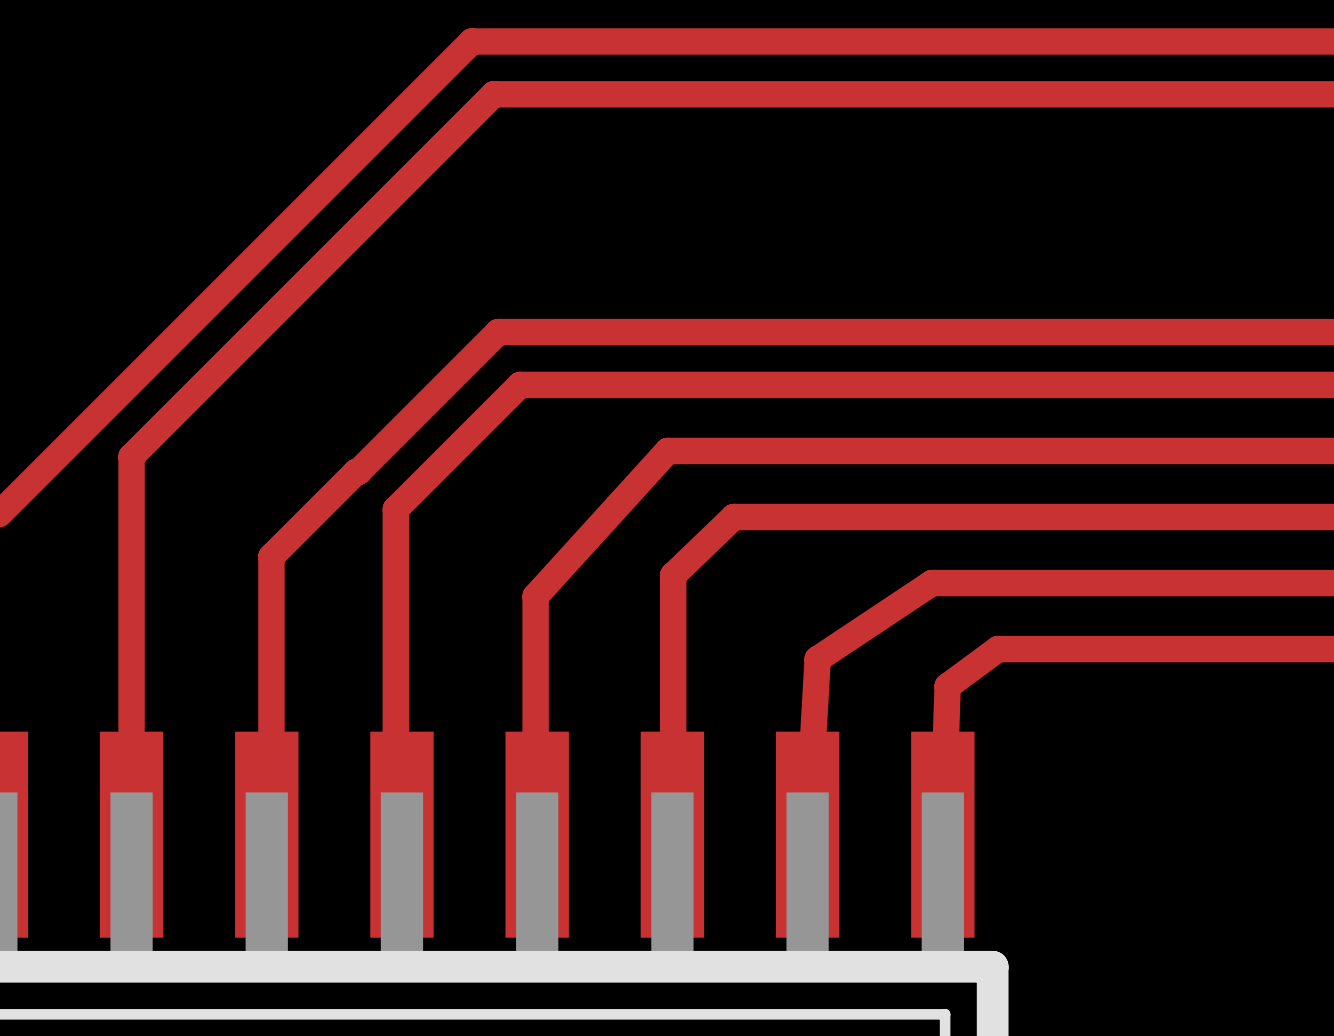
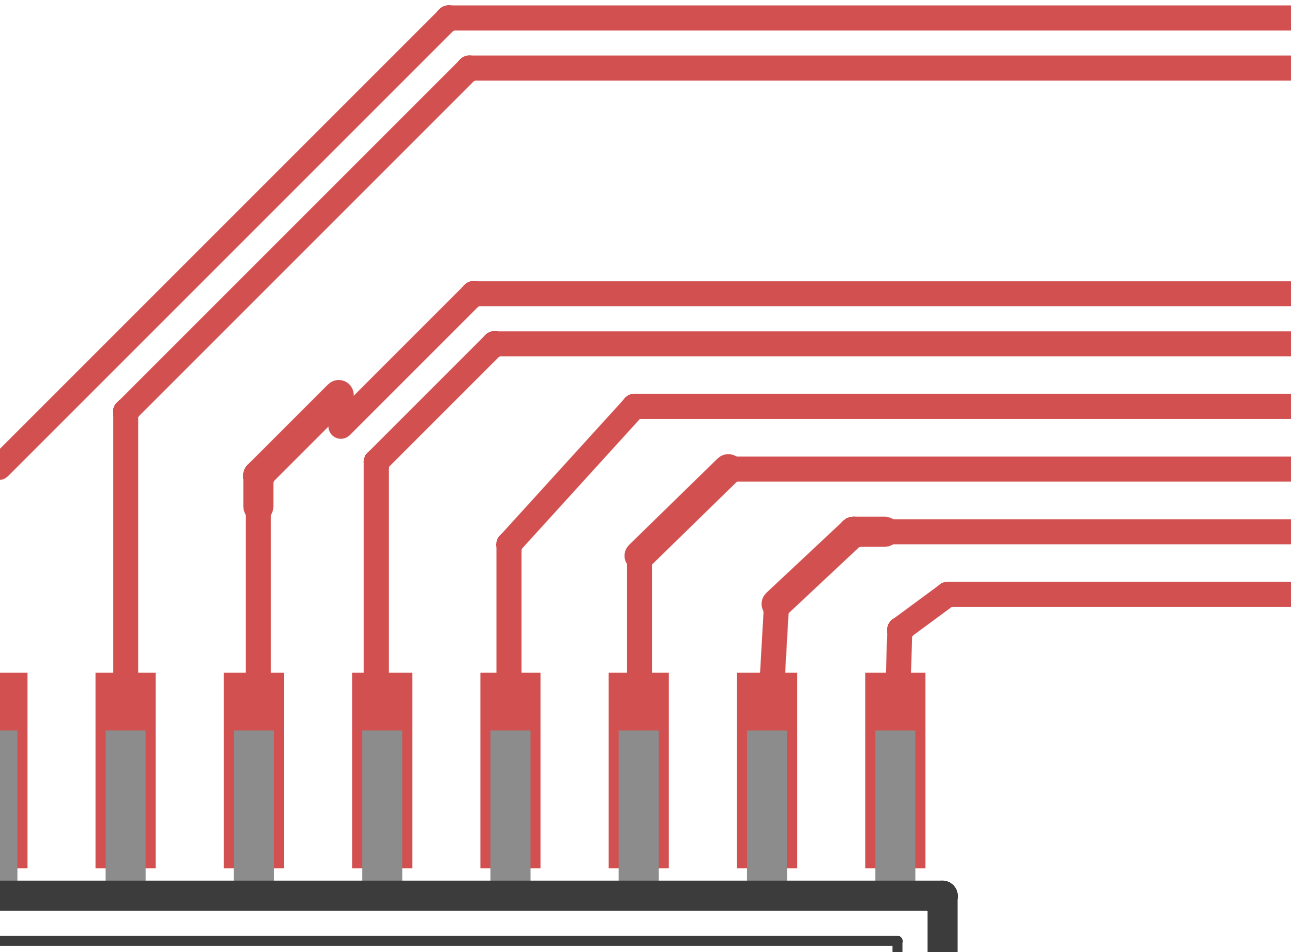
top track: (356, 471) (271, 556) -> (338, 394) (258, 475) (258, 506)
top track: (766, 517) (733, 517) (673, 575) (673, 608) -> (728, 469) (639, 555)
top track: (931, 583) (817, 659) -> (884, 531) (853, 531) (776, 603)

